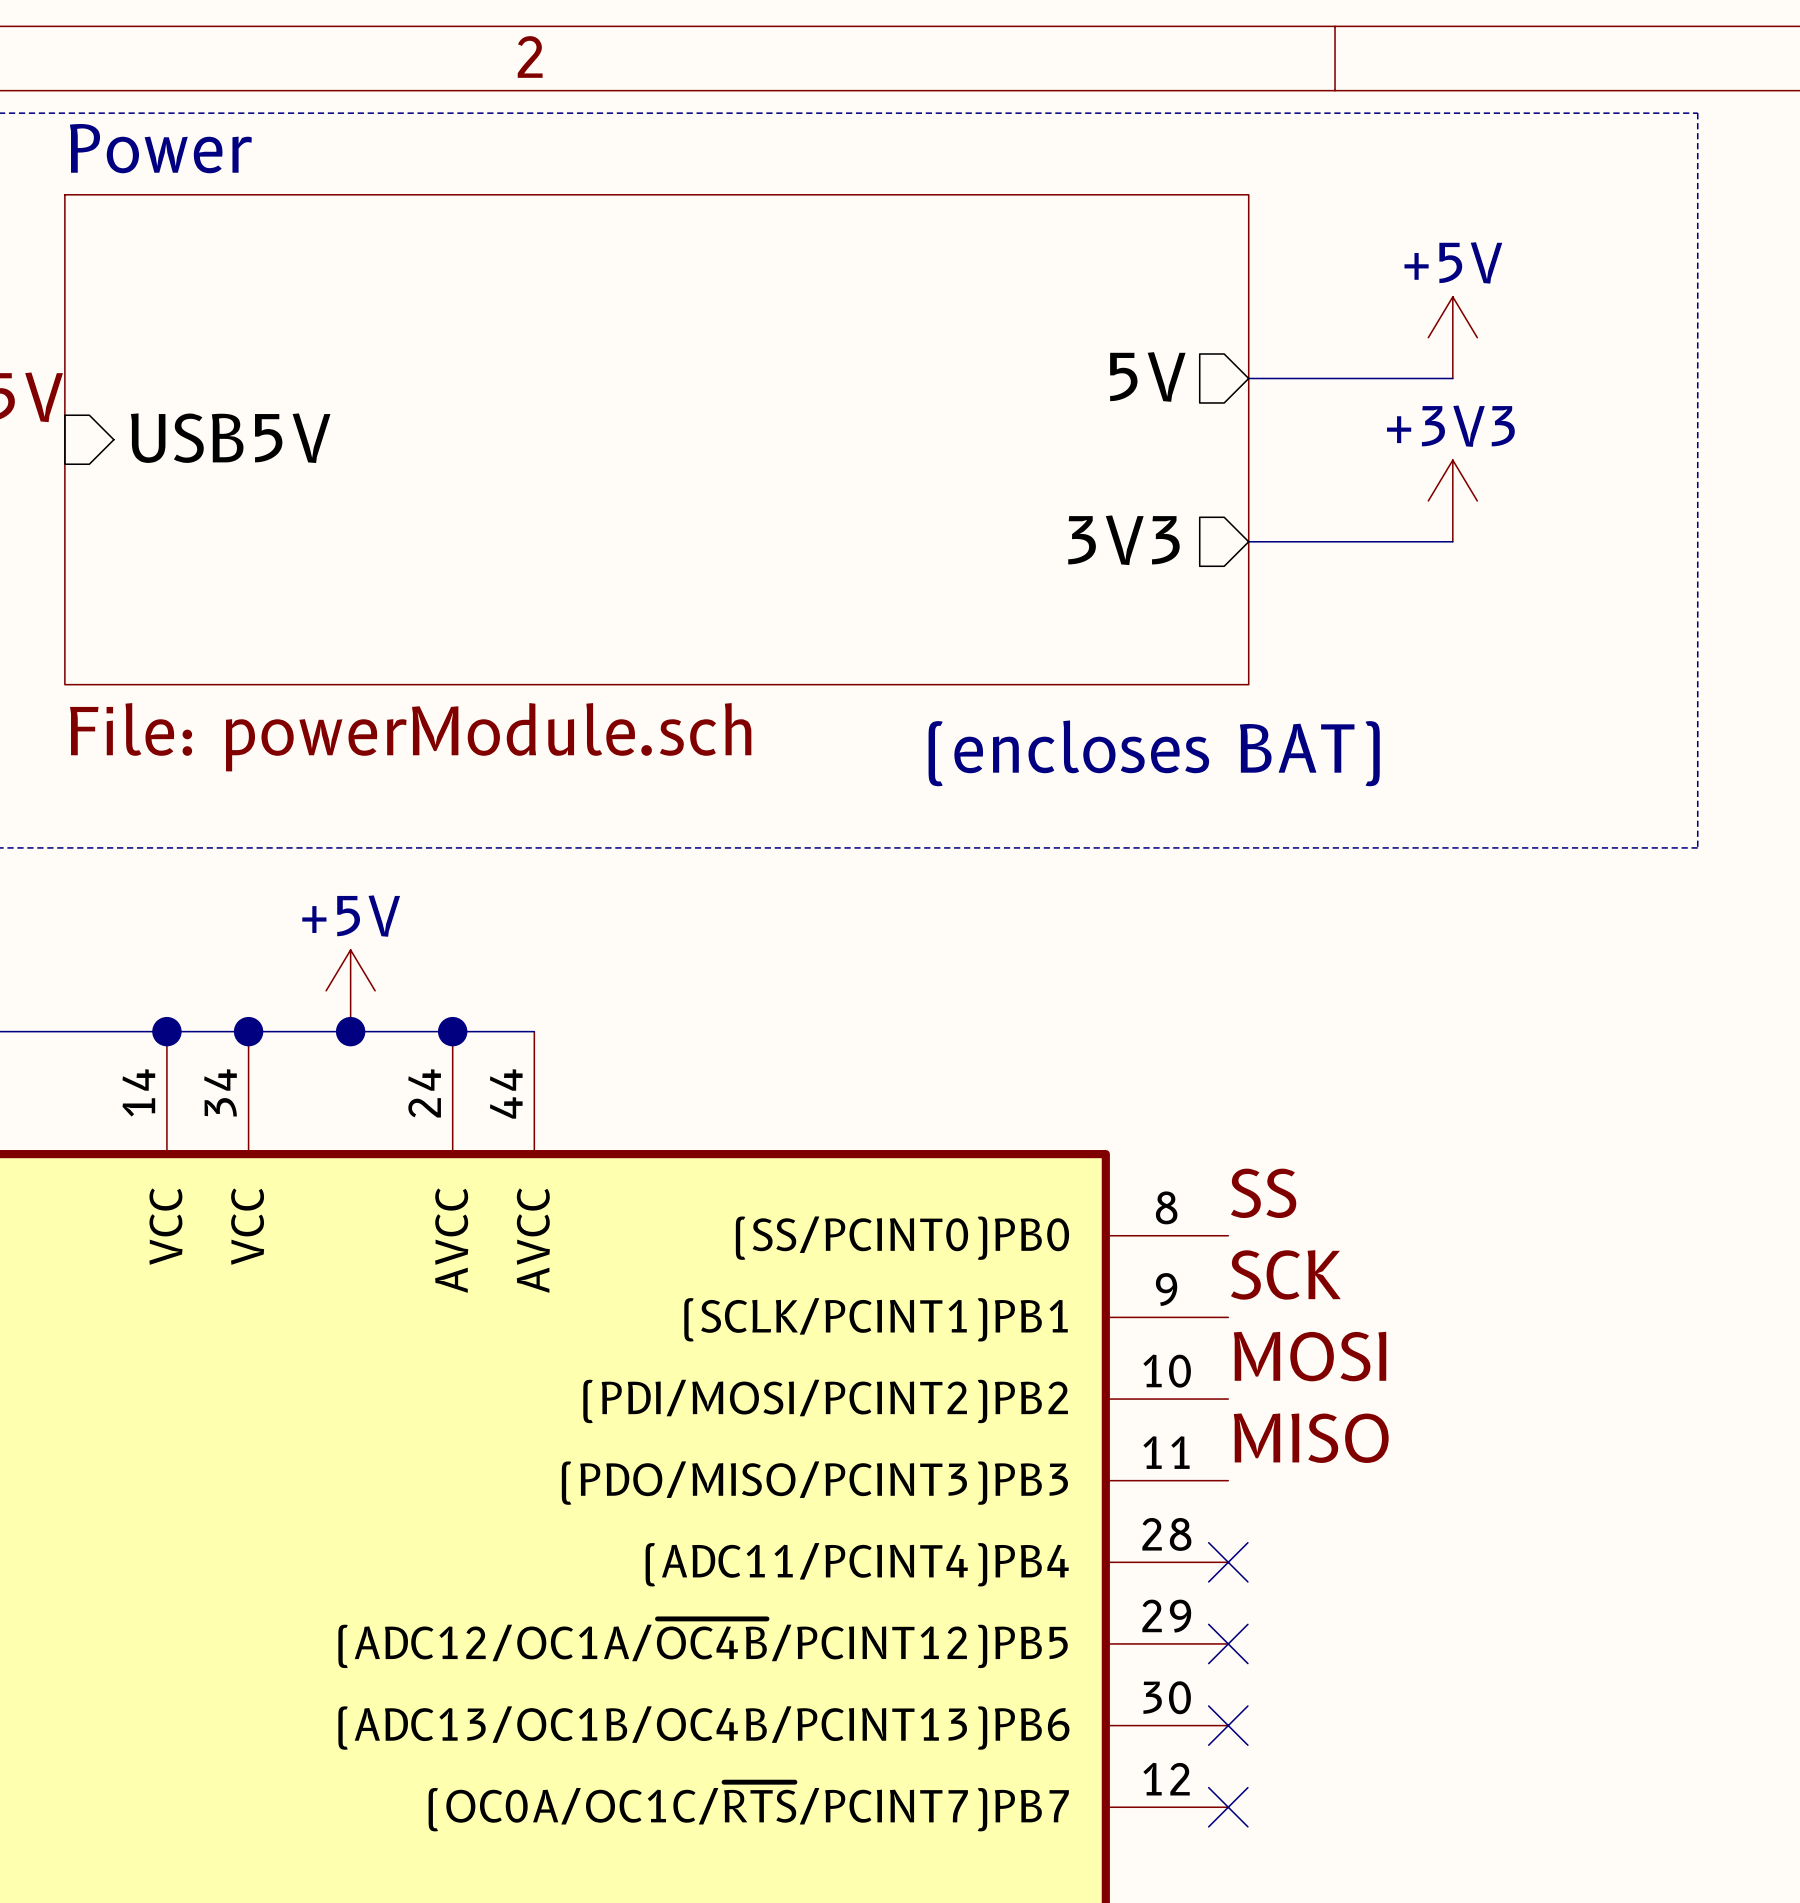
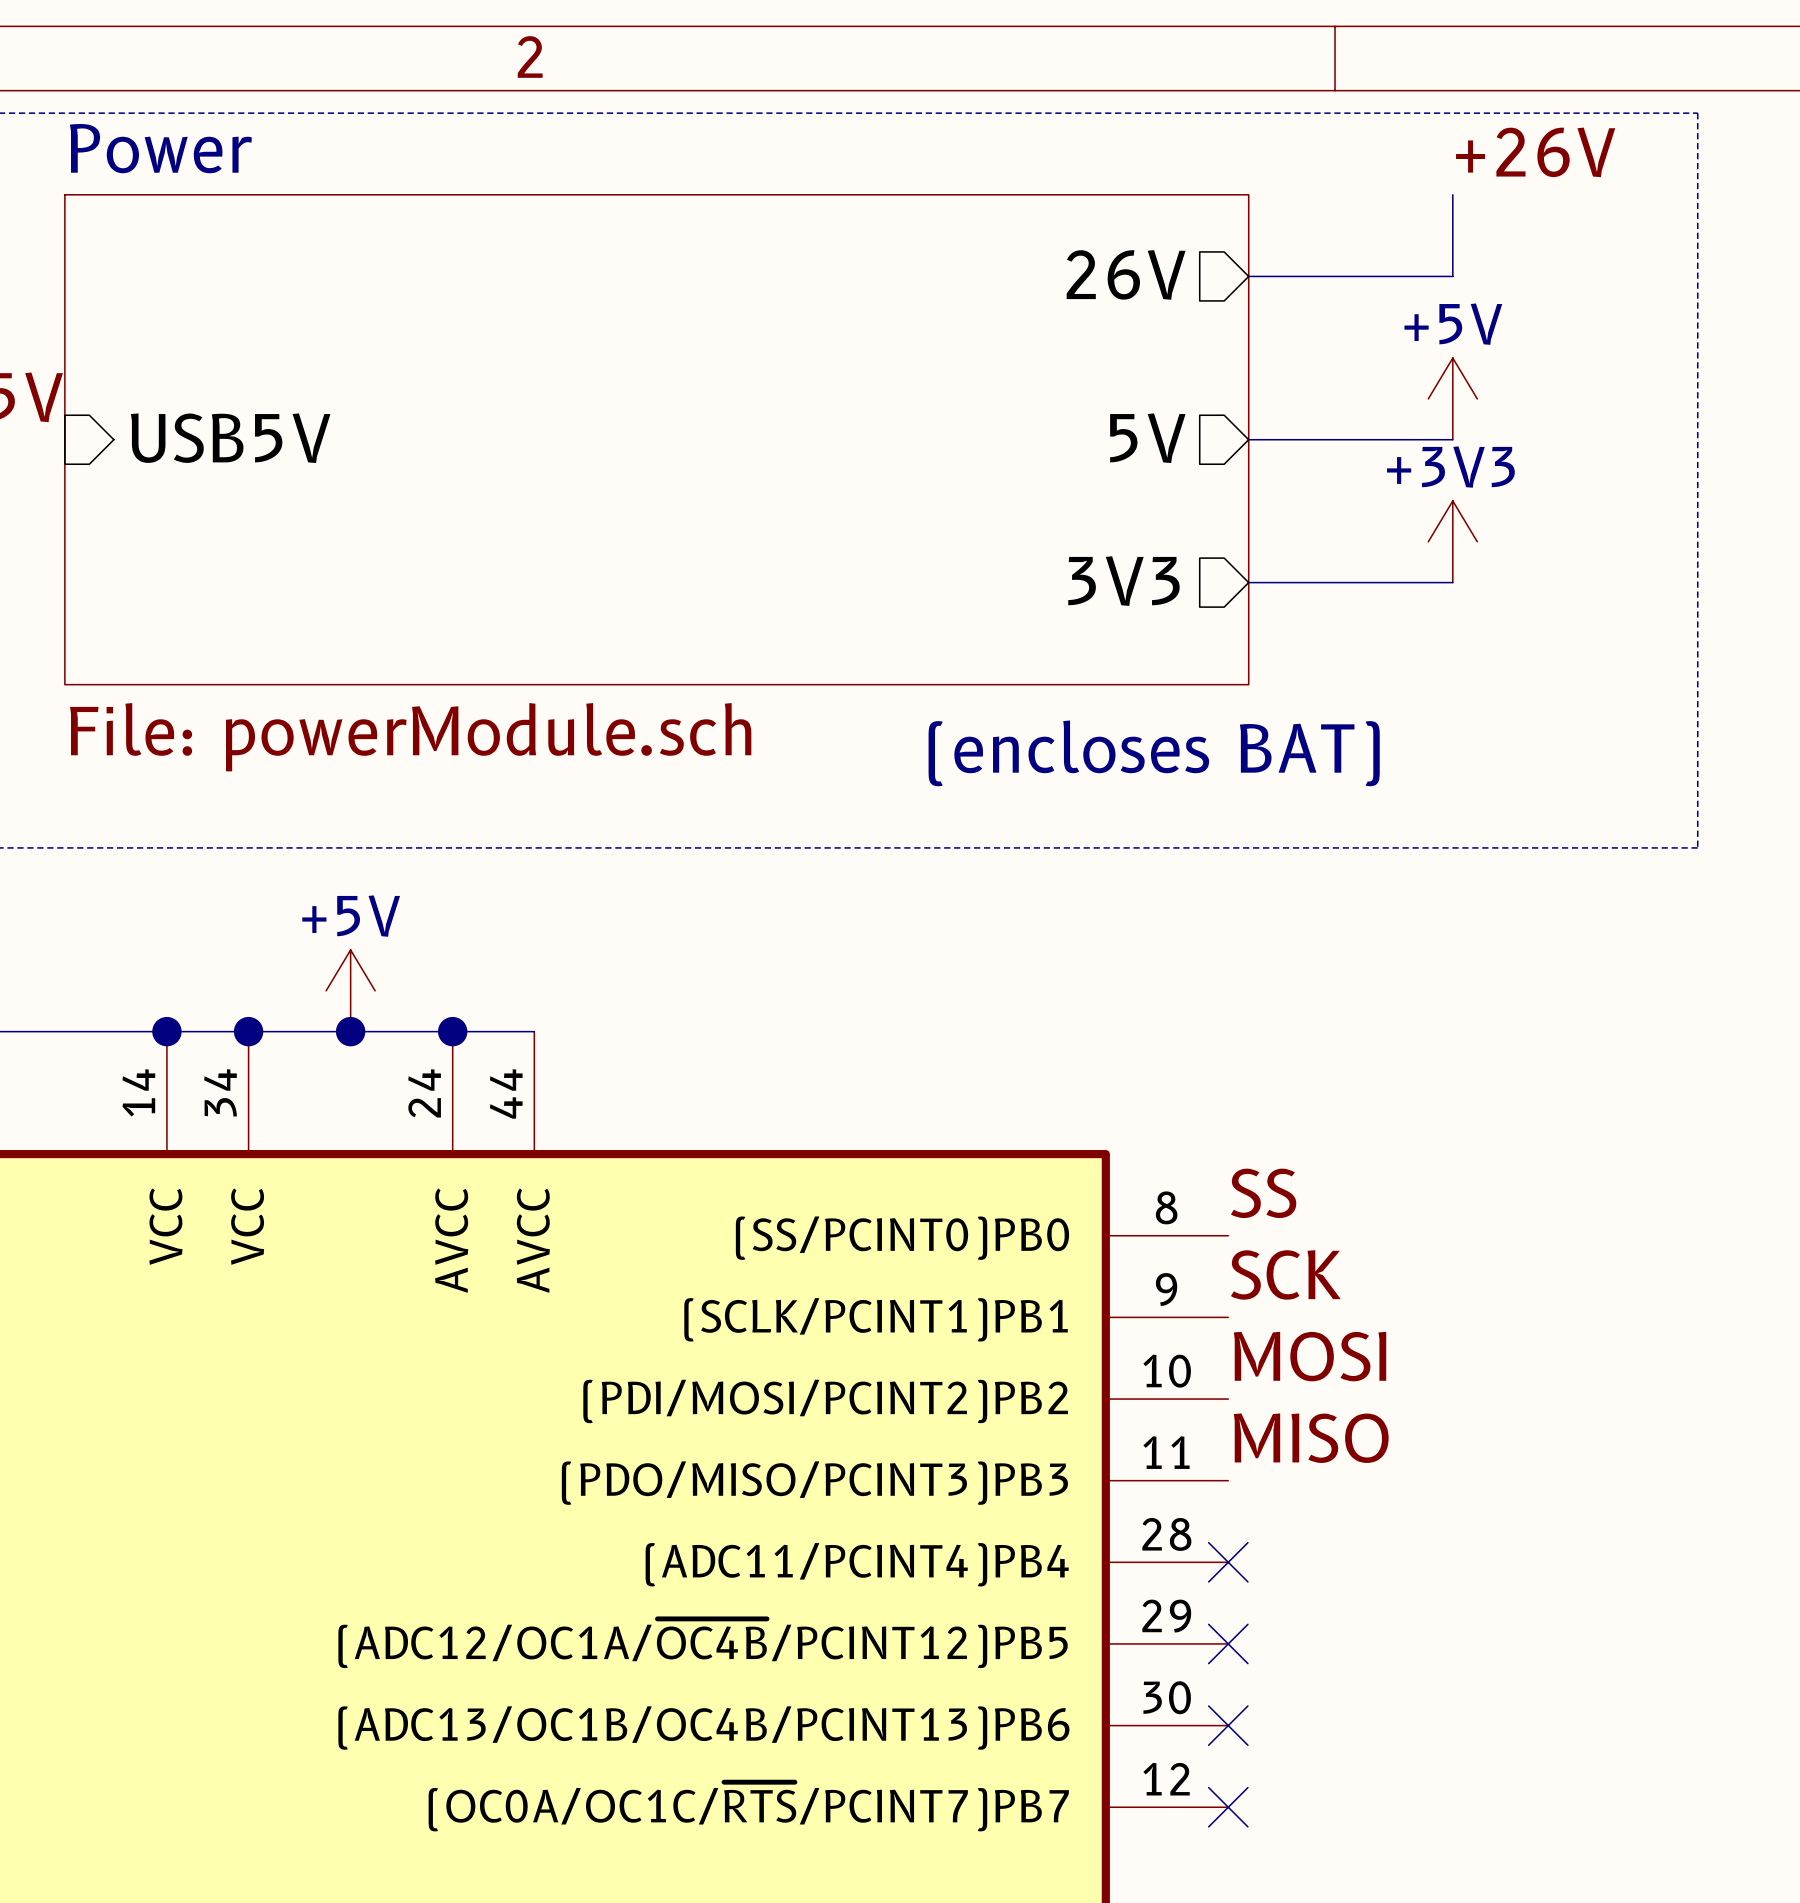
label: none -> +26V (1535, 152)
wire: none -> (1452, 194) (1452, 276) (1248, 276)
sheet pin: none -> 26V (1126, 274)
power symbol position: +5V (1452, 337) -> +5V (1452, 398)
sheet pin position: 5V (1147, 376) -> 5V (1147, 438)
wire: (1248, 378) (1452, 378) -> (1248, 439) (1452, 439)
power symbol position: +3V3 (1452, 500) -> +3V3 (1452, 541)
sheet pin position: 3V3 (1123, 540) -> 3V3 (1123, 581)
wire: (1248, 541) (1452, 541) -> (1248, 582) (1452, 582)

